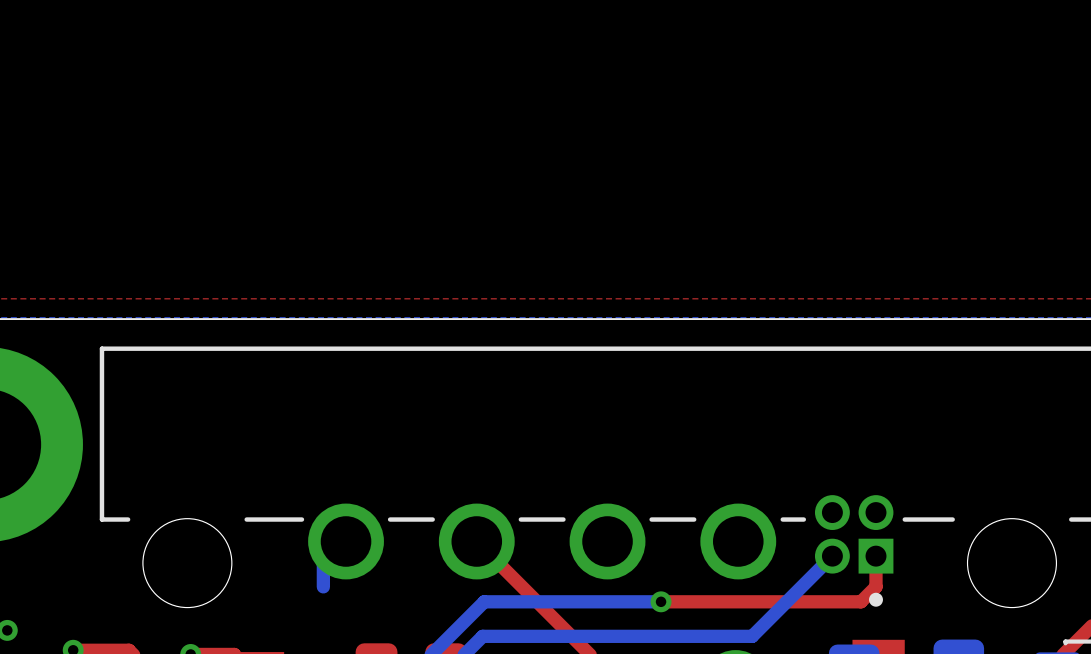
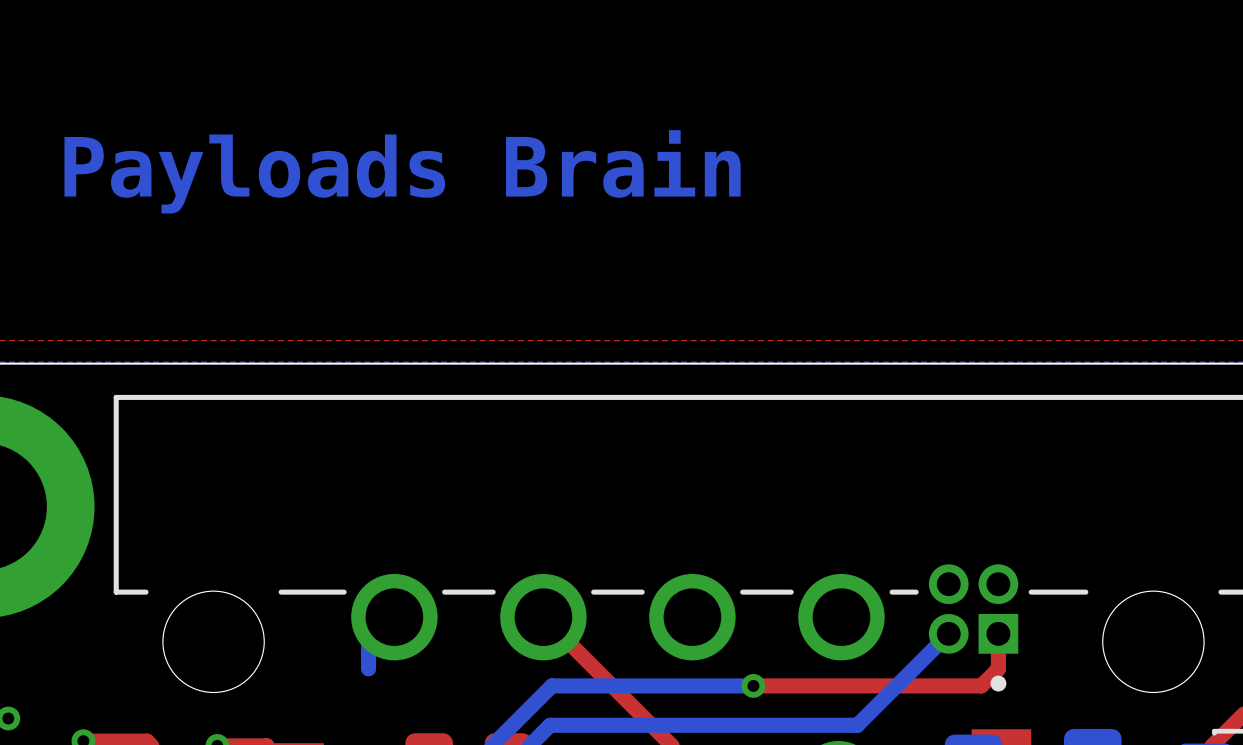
text: none -> Payloads Brain (402, 171)

